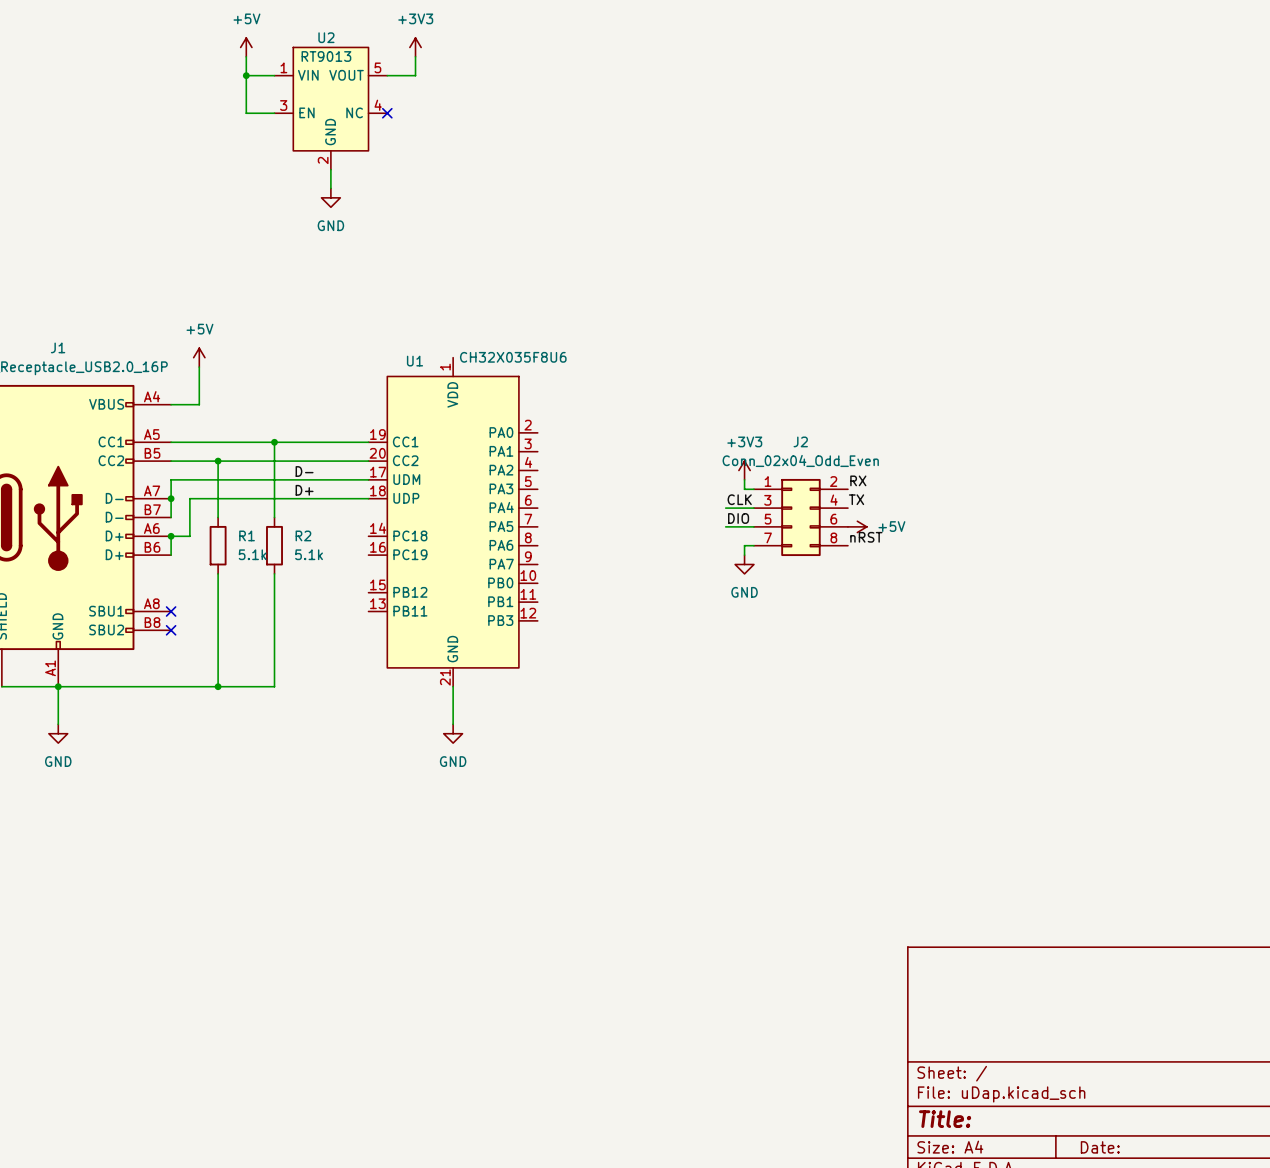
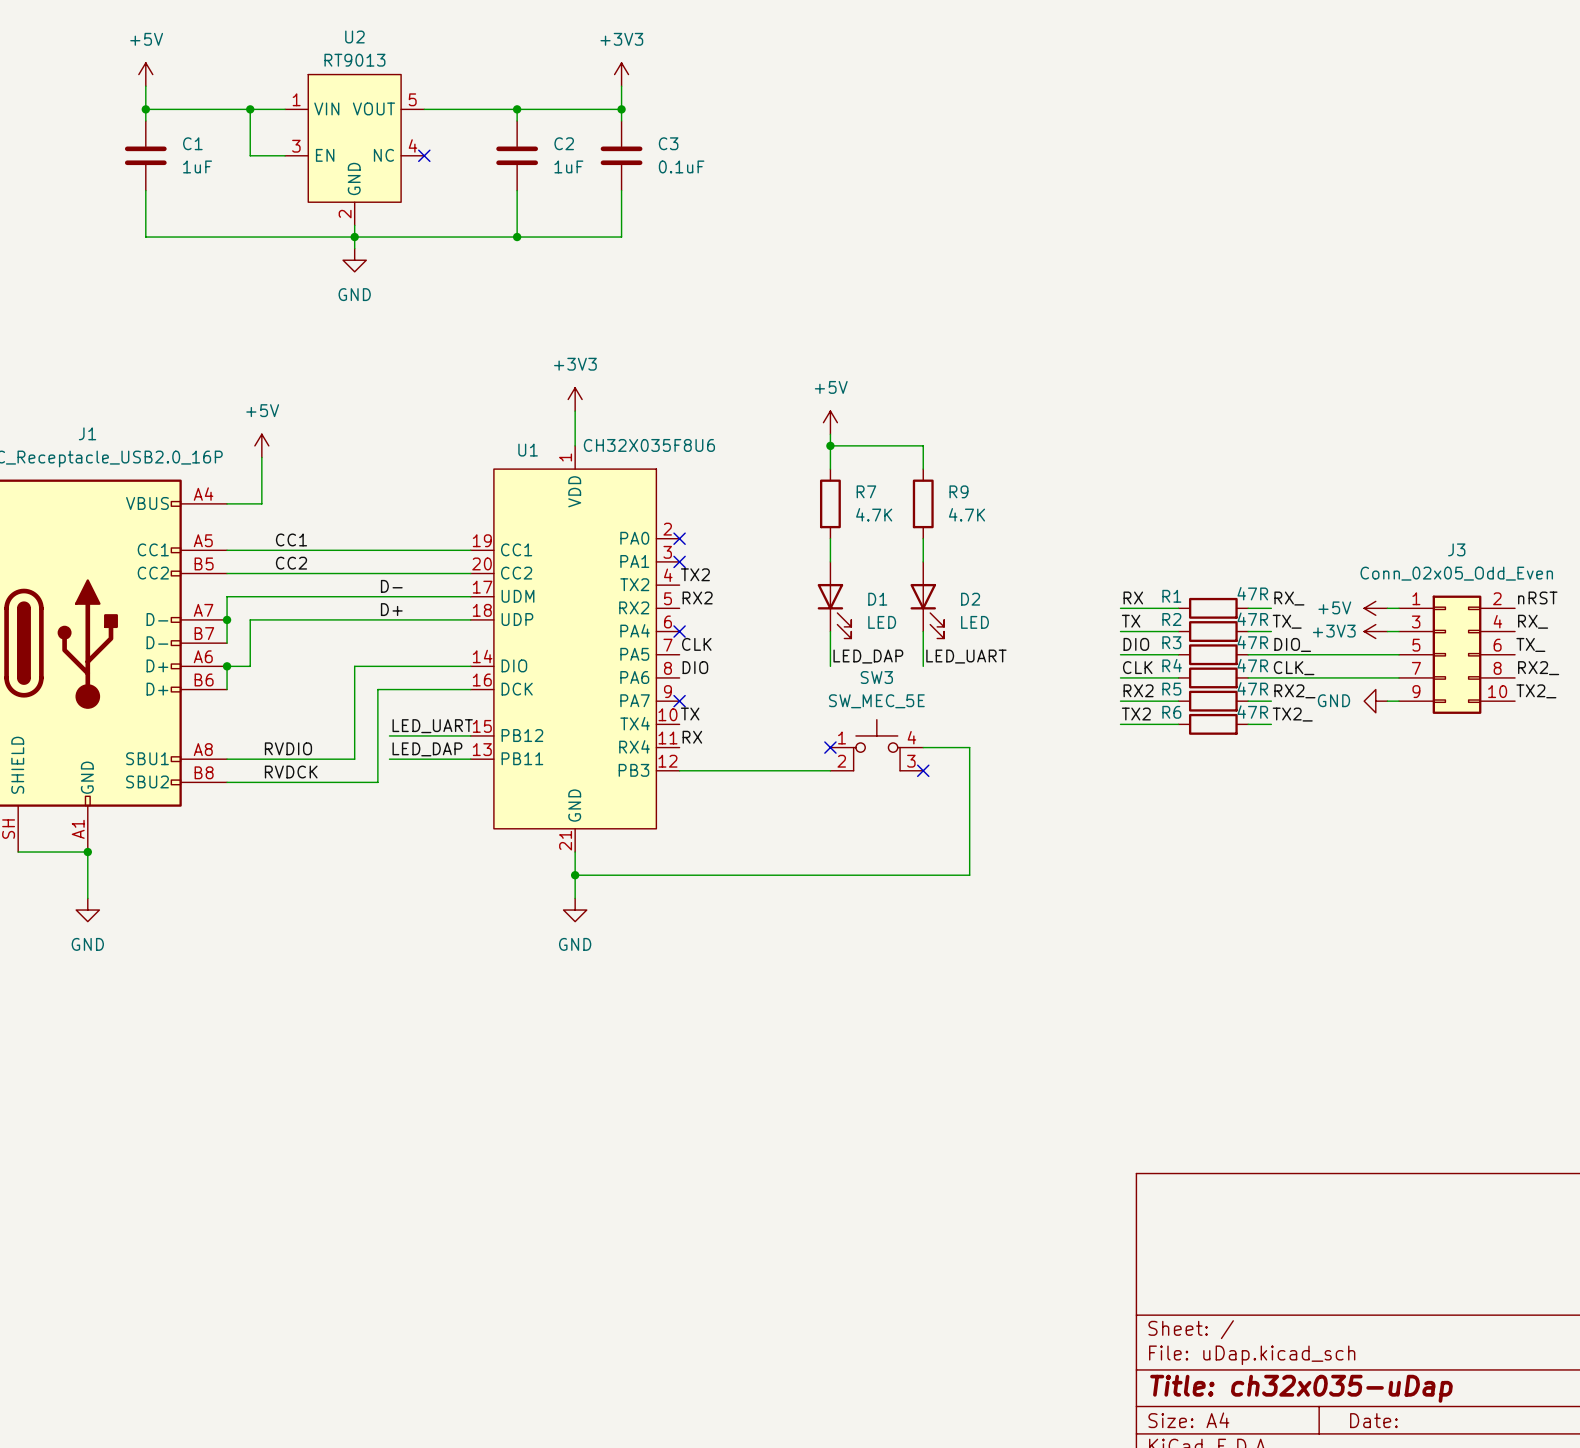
U2 name position: U2 (326, 37) -> U2 (354, 37)
power symbol position: +5V (246, 47) -> +5V (145, 74)
power symbol position: +3V3 (415, 47) -> +3V3 (621, 74)
U2 value position: RT9013 (326, 56) -> RT9013 (354, 60)
wire: (415, 56) (415, 75) (387, 75) -> none
wire: none -> (145, 86) (145, 120)
wire: none -> (621, 86) (621, 120)
junction: (246, 75) -> none
wire: none -> (145, 109) (285, 109)
junction: none -> (145, 109)
wire: none -> (250, 109) (250, 155) (285, 155)
junction: none -> (250, 109)
wire: none -> (424, 109) (621, 109)
wire: none -> (517, 109) (517, 120)
junction: none -> (517, 109)
junction: none -> (621, 109)
U2 position: (330, 108) -> (354, 149)
no-connect mark: (387, 113) -> none
C1: none -> 1uF (145, 155)
no-connect mark: none -> (424, 155)
C2: none -> 1uF (517, 155)
C3: none -> 0.1uF (621, 155)
wire: none -> (145, 190) (145, 237) (621, 237) (621, 190)
wire: none -> (517, 190) (517, 237)
wire: (330, 169) (330, 188) -> (354, 225) (354, 248)
junction: none -> (354, 237)
junction: none -> (517, 237)
power symbol position: GND (330, 197) -> GND (354, 260)
power symbol: none -> +3V3 (575, 399)
wire: none -> (575, 411) (575, 445)
power symbol: none -> +5V (830, 422)
wire: none -> (830, 434) (830, 469)
wire: none -> (830, 445) (923, 445) (923, 469)
junction: none -> (830, 445)
R7: none -> 4.7K (830, 503)
R9: none -> 4.7K (923, 503)
no-connect mark: none -> (679, 538)
wire: none -> (830, 538) (830, 561)
wire: none -> (923, 538) (923, 561)
label: none -> CC1 (291, 539)
wire: (274, 442) (274, 517) -> none
junction: (274, 442) -> none
no-connect mark: none -> (679, 561)
label: none -> CC2 (291, 563)
wire: (218, 461) (218, 517) -> none
junction: (218, 461) -> none
label: none -> TX2 (695, 574)
U1 pin name: PA2 (501, 470) -> TX2 (634, 584)
power symbol: +3V3 (744, 470) -> none
wire: (744, 479) (744, 489) (753, 489) -> none
label: none -> RX2 (697, 597)
label position: RX (858, 480) -> RX (1133, 597)
label: none -> nRST (1537, 597)
label: none -> RX_ (1289, 598)
D1: none -> LED (834, 600)
D2: none -> LED (927, 600)
U1 pin name: PA3 (501, 488) -> RX2 (634, 607)
wire: none -> (1120, 608) (1178, 608)
wire: none -> (1248, 608) (1271, 608)
power symbol: none -> +5V (1375, 608)
wire: none -> (1387, 608) (1399, 608)
label: CLK (739, 499) -> none
label position: TX (856, 499) -> TX (1131, 621)
label: none -> TX_ (1287, 621)
label: none -> RX_ (1533, 621)
no-connect mark: none -> (679, 631)
wire: none -> (830, 631) (830, 666)
wire: (725, 508) (753, 508) -> none
wire: none -> (923, 631) (923, 666)
wire: none -> (1120, 631) (1178, 631)
wire: none -> (1248, 631) (1271, 631)
power symbol: none -> +3V3 (1375, 631)
wire: none -> (1387, 631) (1399, 631)
J2: Conn_02x04_Odd_Even (800, 517) -> none
label: none -> CLK (696, 644)
label: DIO (738, 518) -> none
label: none -> DIO (1136, 644)
label: none -> DIO_ (1292, 644)
label: none -> TX_ (1530, 644)
wire: (725, 526) (753, 526) -> none
power symbol: +5V (857, 526) -> none
wire: none -> (1120, 654) (1178, 654)
R3: none -> 47R (1213, 654)
wire: none -> (1248, 654) (1399, 654)
J3: none -> Conn_02x05_Odd_Even (1457, 654)
label: none -> LED_DAP (868, 656)
label: none -> LED_UART (966, 656)
R1 name position: R1 (247, 535) -> R1 (1171, 596)
R2 name position: R2 (303, 535) -> R2 (1171, 619)
U1 pin name: PC18 (410, 535) -> DIO (514, 665)
wire: none -> (470, 666) (354, 666) (354, 712)
label: none -> DIO (695, 667)
label: nRST (866, 537) -> none
label: none -> CLK (1137, 667)
label: none -> CLK_ (1294, 668)
label: none -> RX2_ (1538, 668)
R1 rotation: 0° (218, 545) -> 90° clockwise (1213, 608)
R1 position: (218, 545) -> (1213, 608)
R2 rotation: 0° (274, 545) -> 90° clockwise (1213, 631)
R2 position: (274, 545) -> (1213, 631)
wire: (753, 545) (744, 545) (744, 555) -> none
wire: none -> (1120, 677) (1178, 677)
R4: none -> 47R (1213, 677)
wire: none -> (1248, 677) (1399, 677)
R1 value: 5.1k (252, 554) -> 47R (1252, 593)
R2 value: 5.1k (309, 554) -> 47R (1252, 619)
U1 pin name: PC19 (410, 554) -> DCK (517, 689)
wire: none -> (470, 689) (377, 689) (377, 782) (227, 782)
label: none -> RX2 (1138, 690)
label: none -> RX2_ (1294, 691)
label: none -> TX2_ (1536, 691)
no-connect mark: none -> (679, 701)
power symbol: GND (744, 564) -> none
wire: none -> (1120, 701) (1178, 701)
R5: none -> 47R (1213, 701)
wire: none -> (1248, 701) (1271, 701)
power symbol: none -> GND (1375, 701)
wire: none -> (1387, 701) (1399, 701)
wire: (218, 573) (218, 686) -> none
label: none -> TX (690, 714)
label: none -> TX2 (1136, 714)
label: none -> TX2_ (1292, 714)
U1 pin name: PB0 (500, 582) -> TX4 (635, 723)
wire: none -> (1120, 724) (1178, 724)
R6: none -> 47R (1213, 724)
wire: none -> (1248, 724) (1271, 724)
label: none -> LED_UART (432, 726)
wire: none -> (389, 735) (470, 735)
label: none -> RX (692, 737)
SW3: none -> SW_MEC_5E (876, 745)
U1 pin name: PB1 (500, 601) -> RX4 (634, 746)
no-connect mark: none -> (830, 747)
wire: none -> (923, 747) (969, 747) (969, 875) (575, 875)
label: none -> RVDIO (288, 748)
label: none -> LED_DAP (427, 749)
no-connect mark: (171, 611) -> none
wire: (274, 611) (274, 686) (58, 686) -> (354, 759) (227, 759)
wire: none -> (389, 759) (470, 759)
wire: none -> (679, 770) (830, 770)
no-connect mark: none -> (923, 770)
label: none -> RVDCK (291, 772)
no-connect mark: (171, 630) -> none
junction: (218, 686) -> none
junction: none -> (575, 875)
title block: Title: (945, 1119) -> Title: ch32x035-uDap (1301, 1388)

